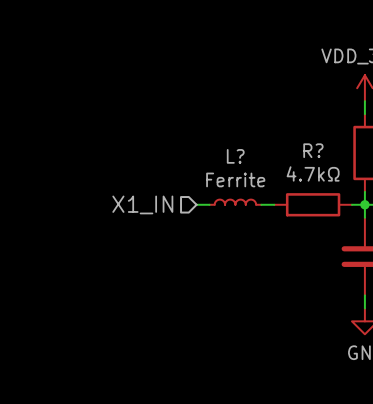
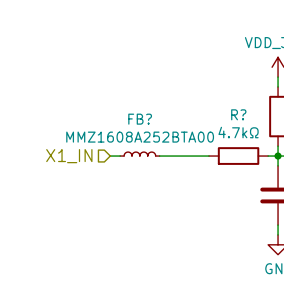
FB?: none -> MMZ1608A252BTA00 (139, 154)
L?: Ferrite (235, 202) -> none
hierarchical label position: X1_IN (142, 204) -> X1_IN (69, 156)
wire: none -> (110, 156) (120, 156)
wire: (196, 204) (209, 204) -> (199, 156) (159, 156)

